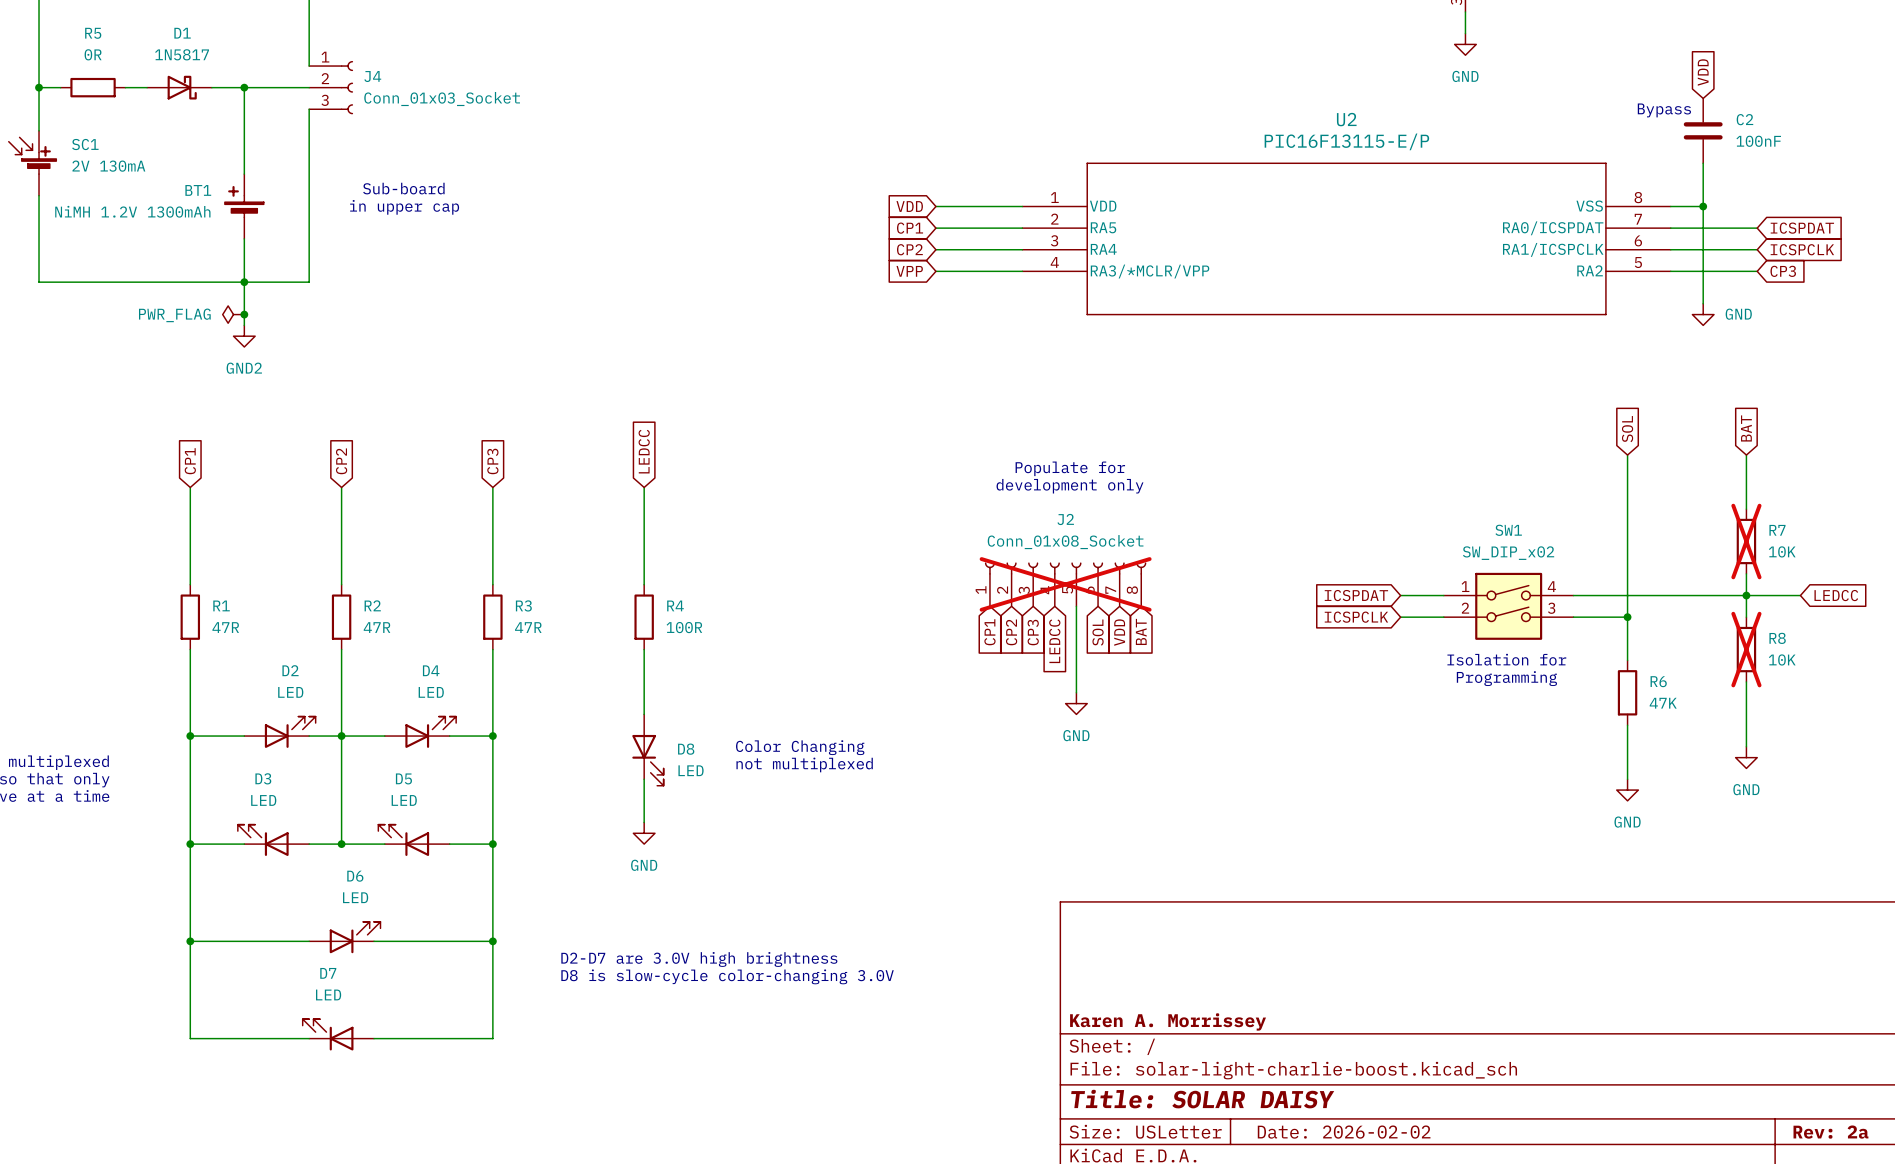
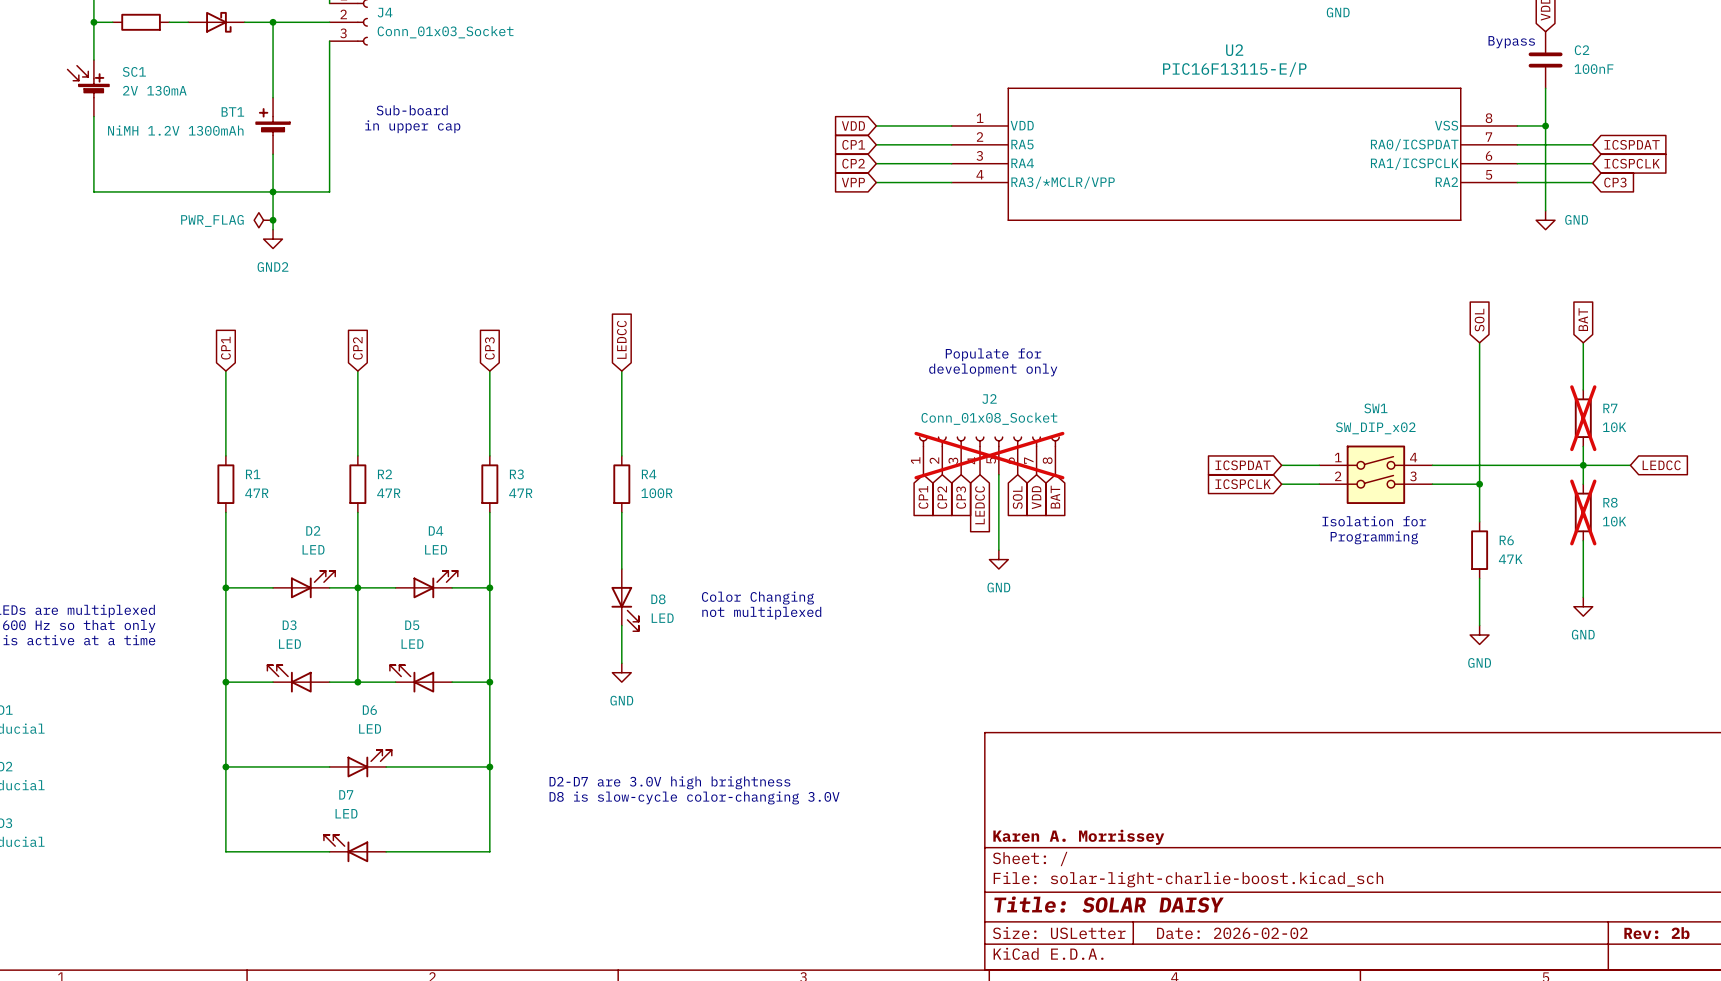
title block: Rev: 2a (1830, 1132) -> Rev: 2b (1656, 933)

